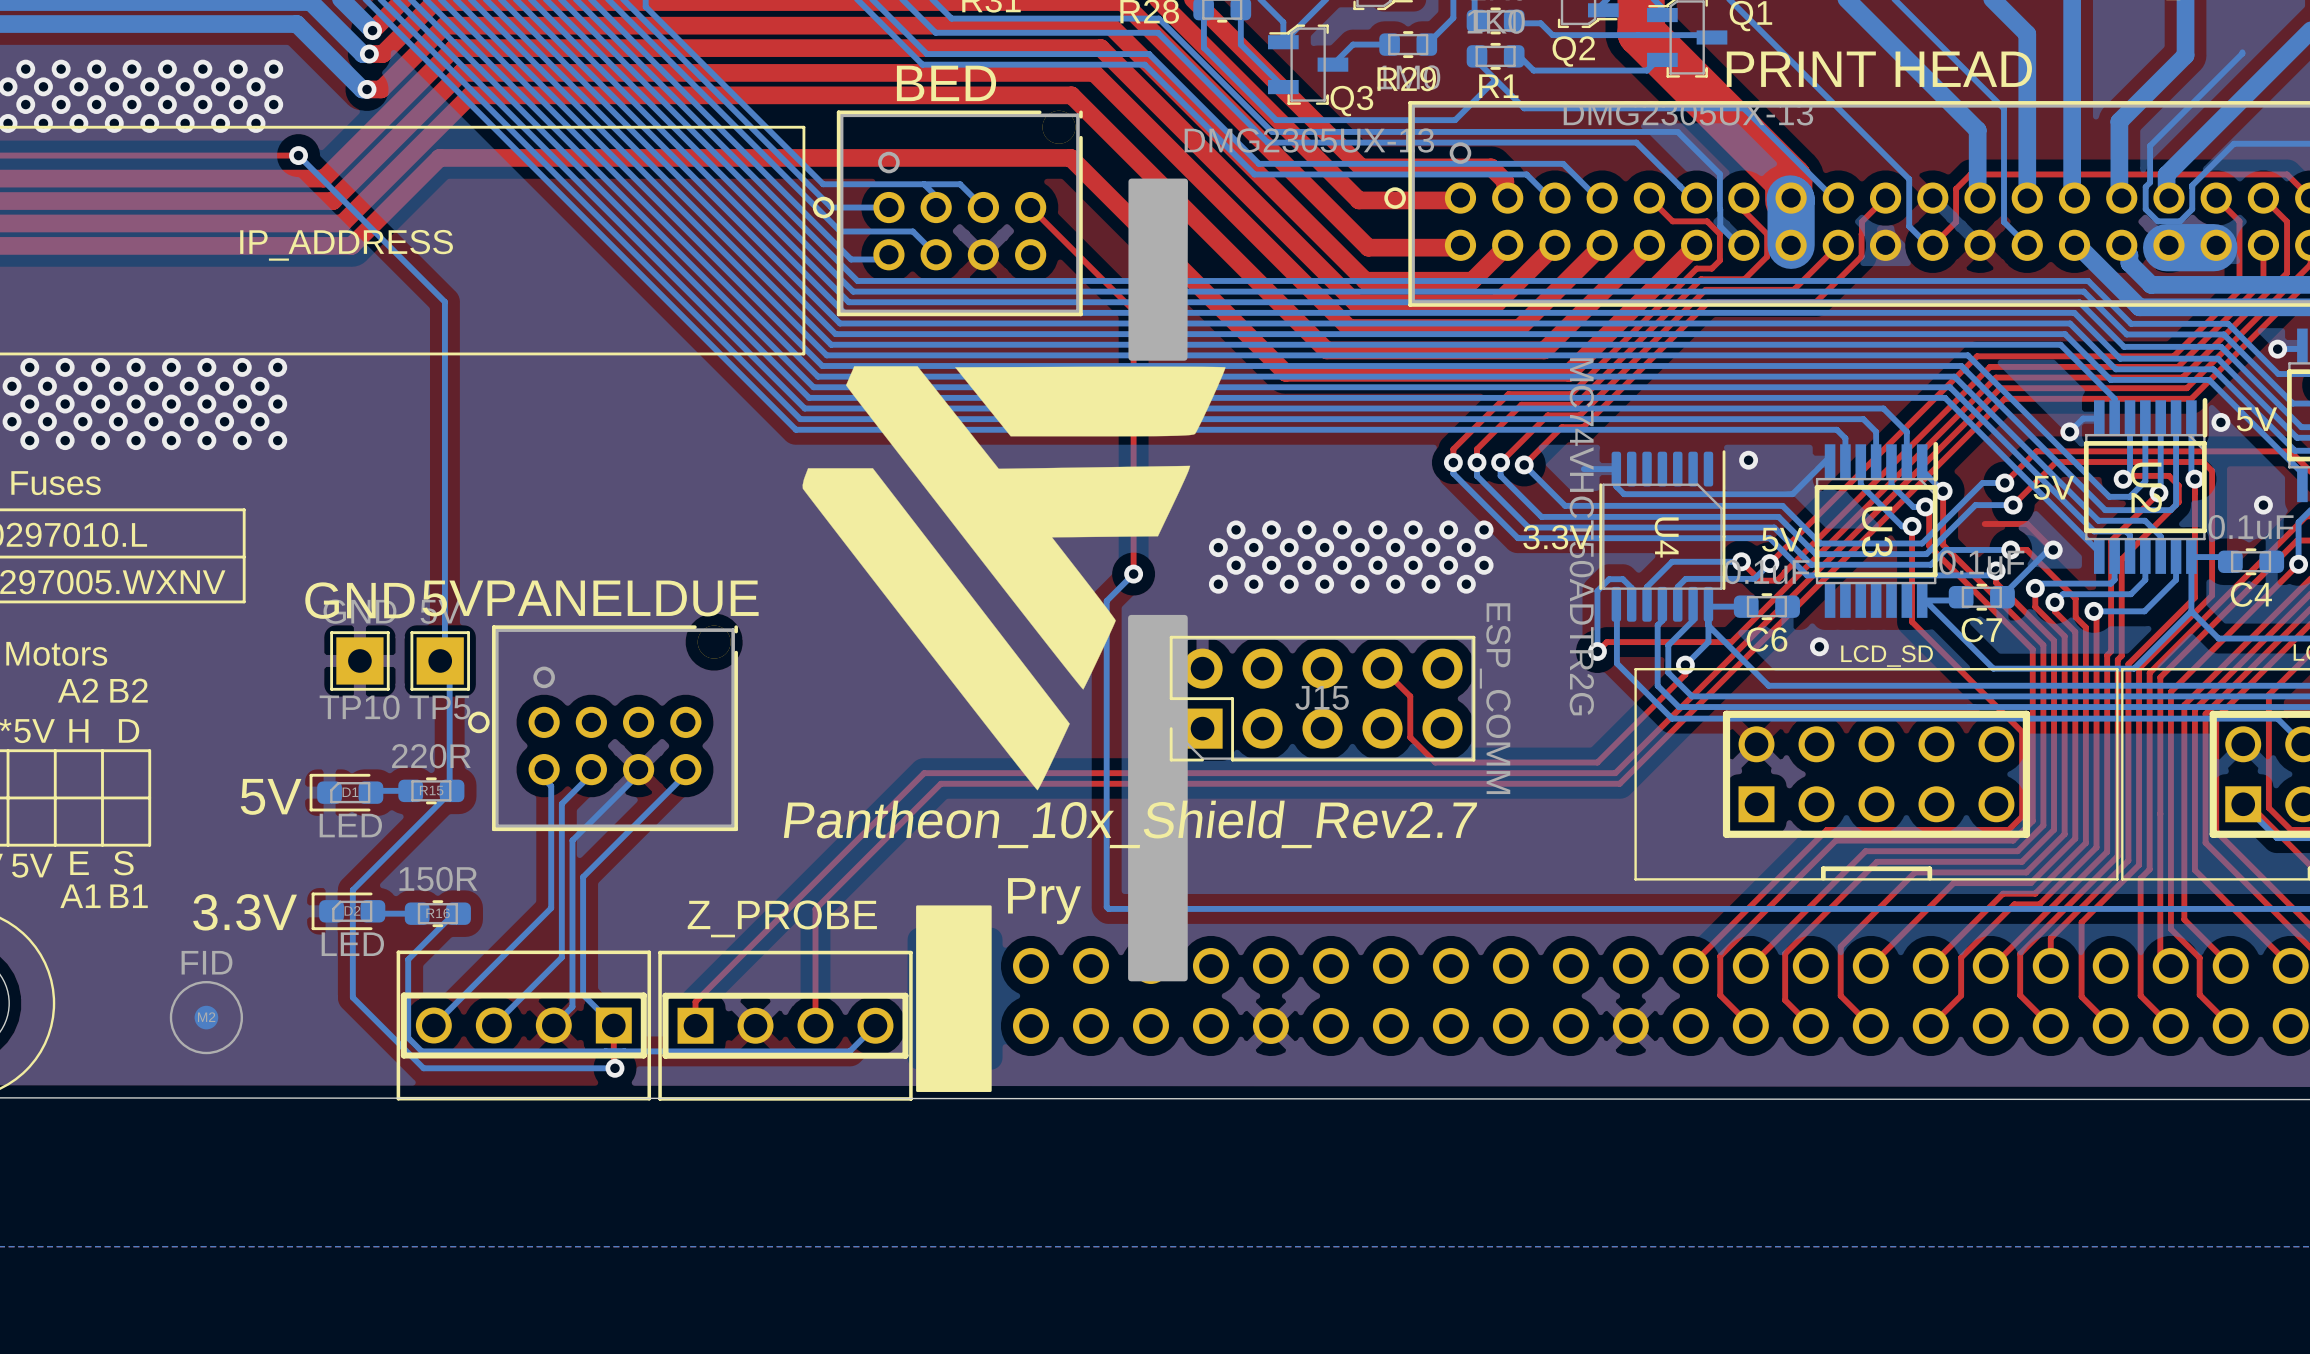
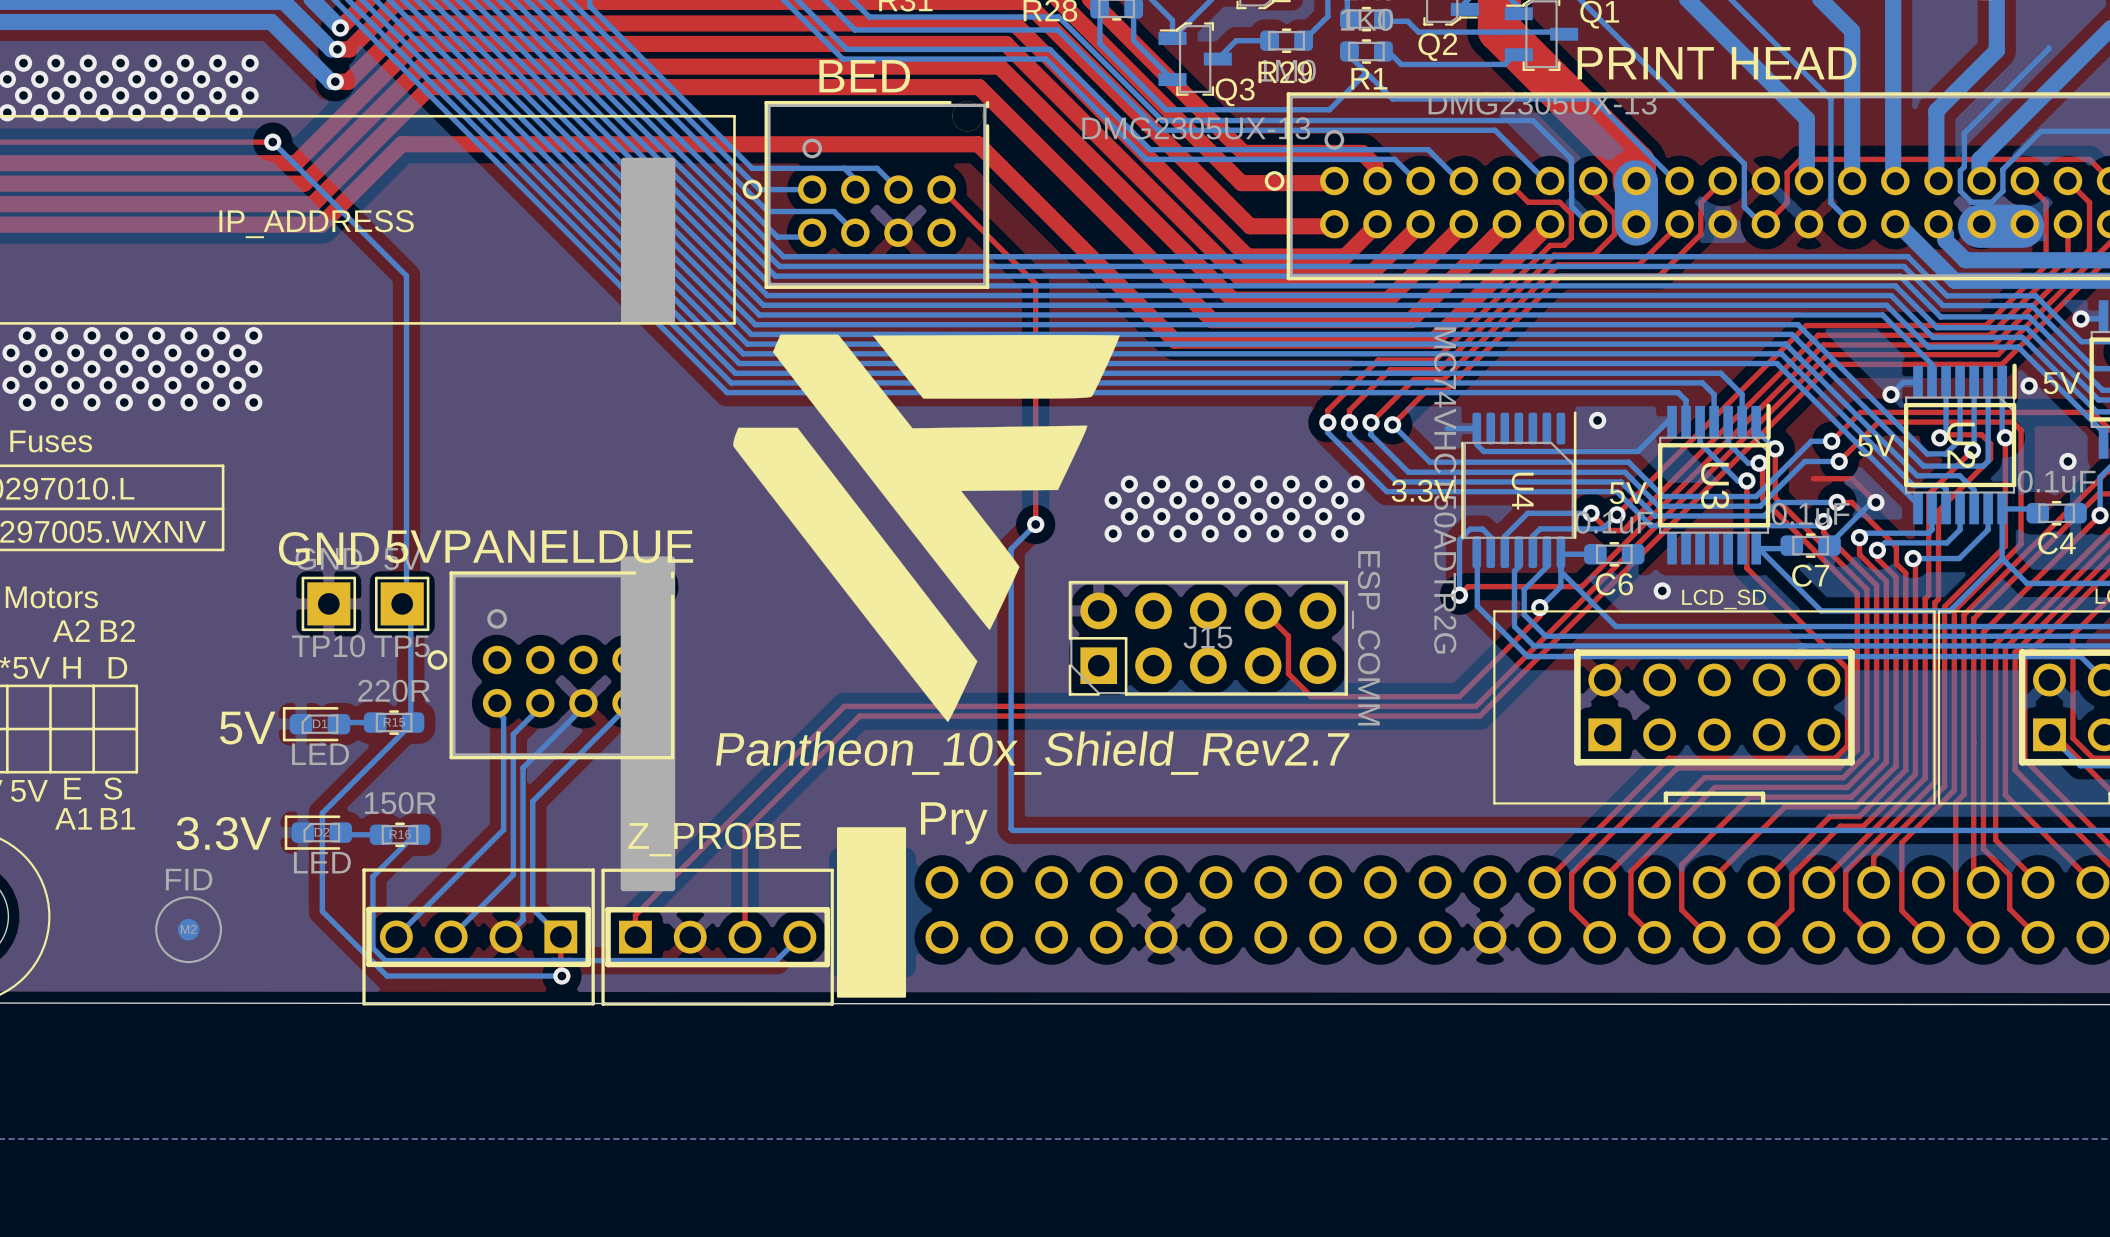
drawing position: (1158, 269) -> (648, 240)
drawing position: (1157, 798) -> (647, 723)

